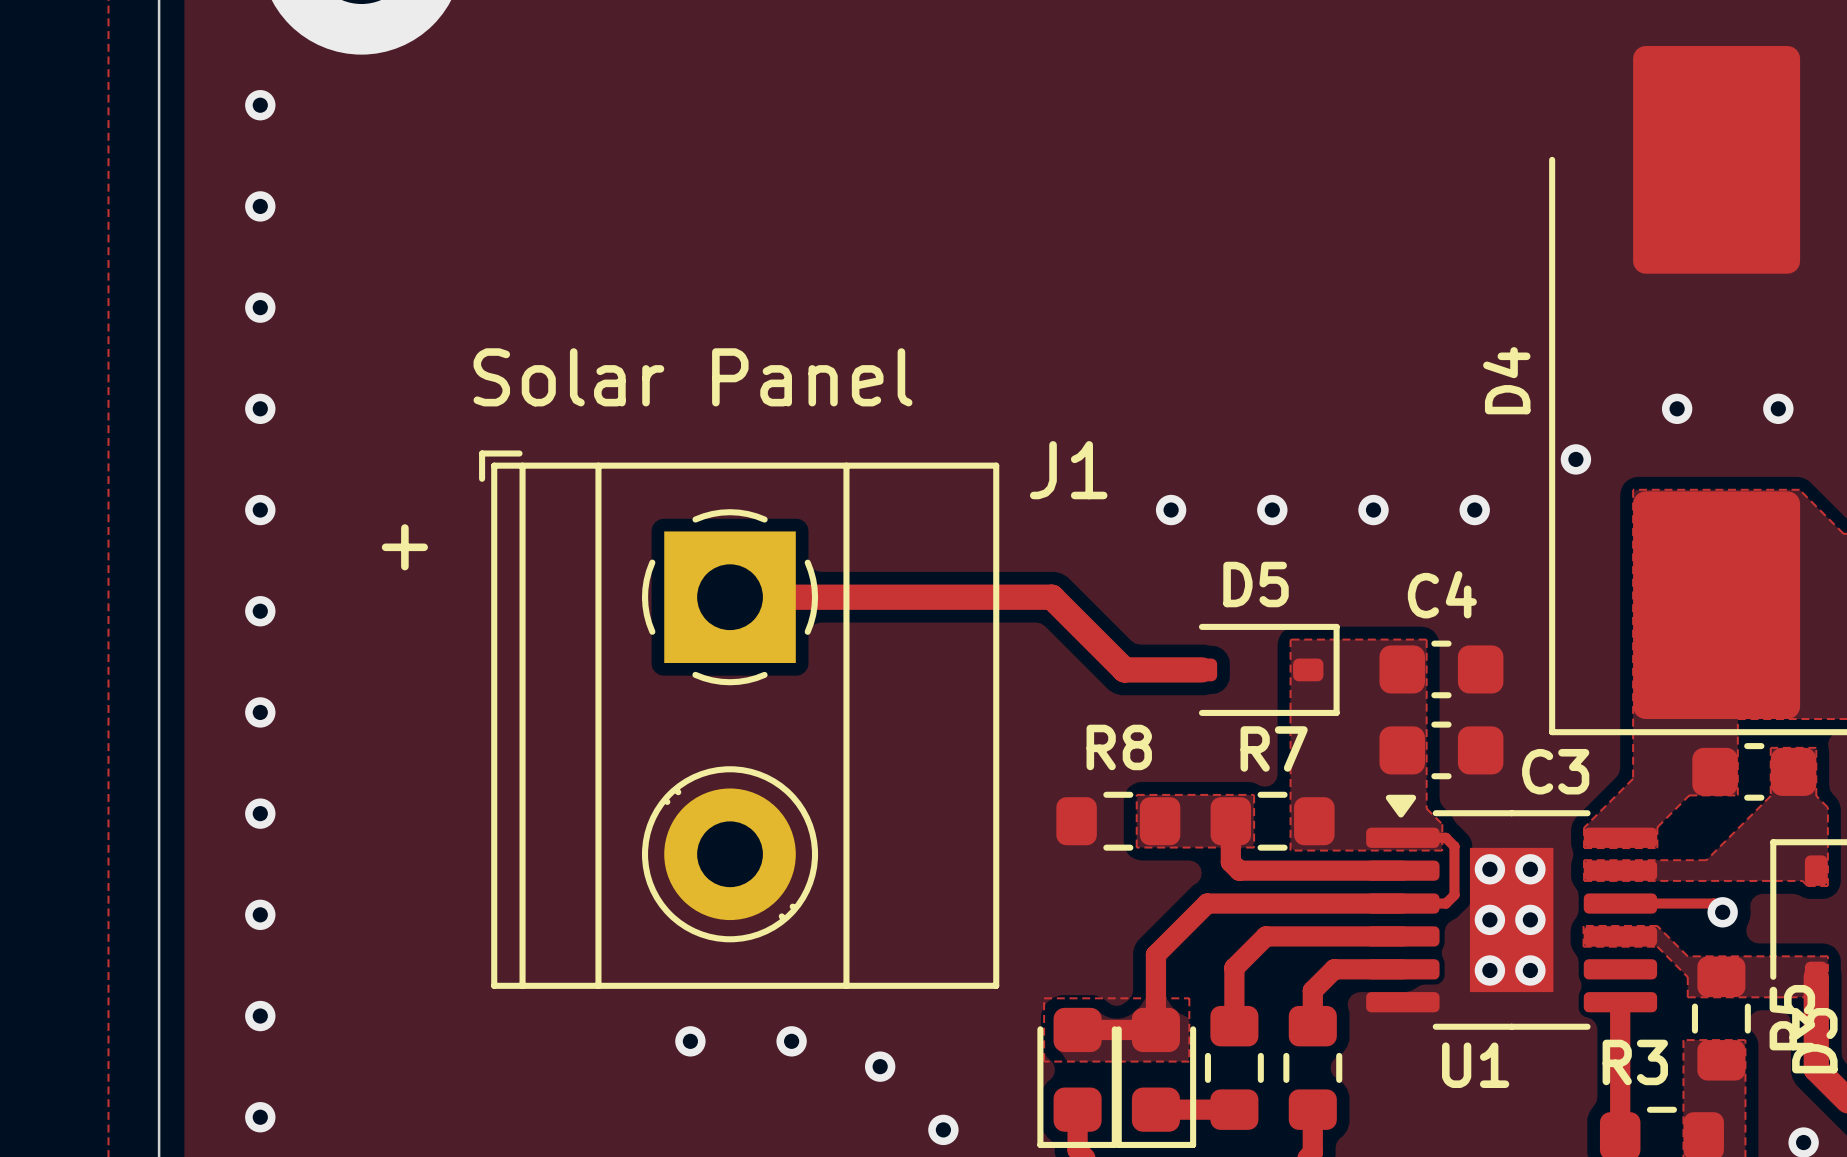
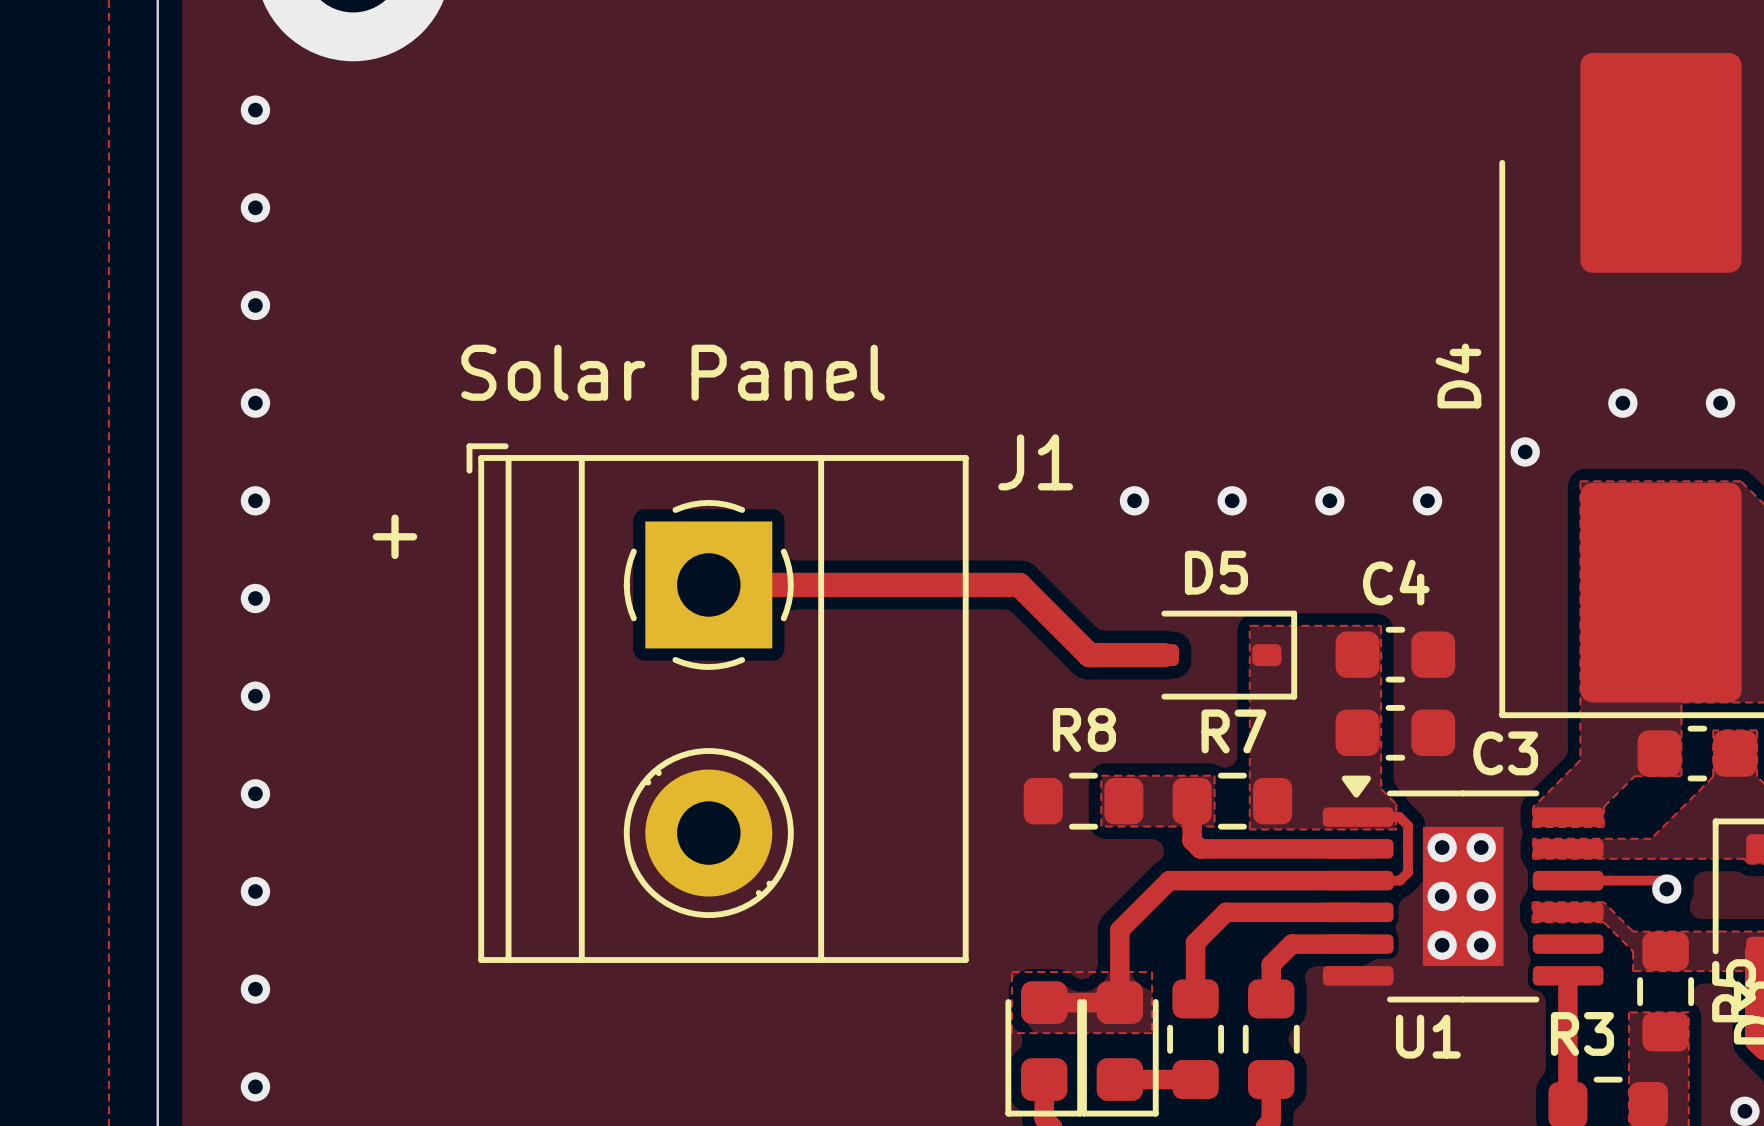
via: (690, 1041) -> none
via: (791, 1041) -> none
via: (880, 1066) -> none
via: (943, 1129) -> none

